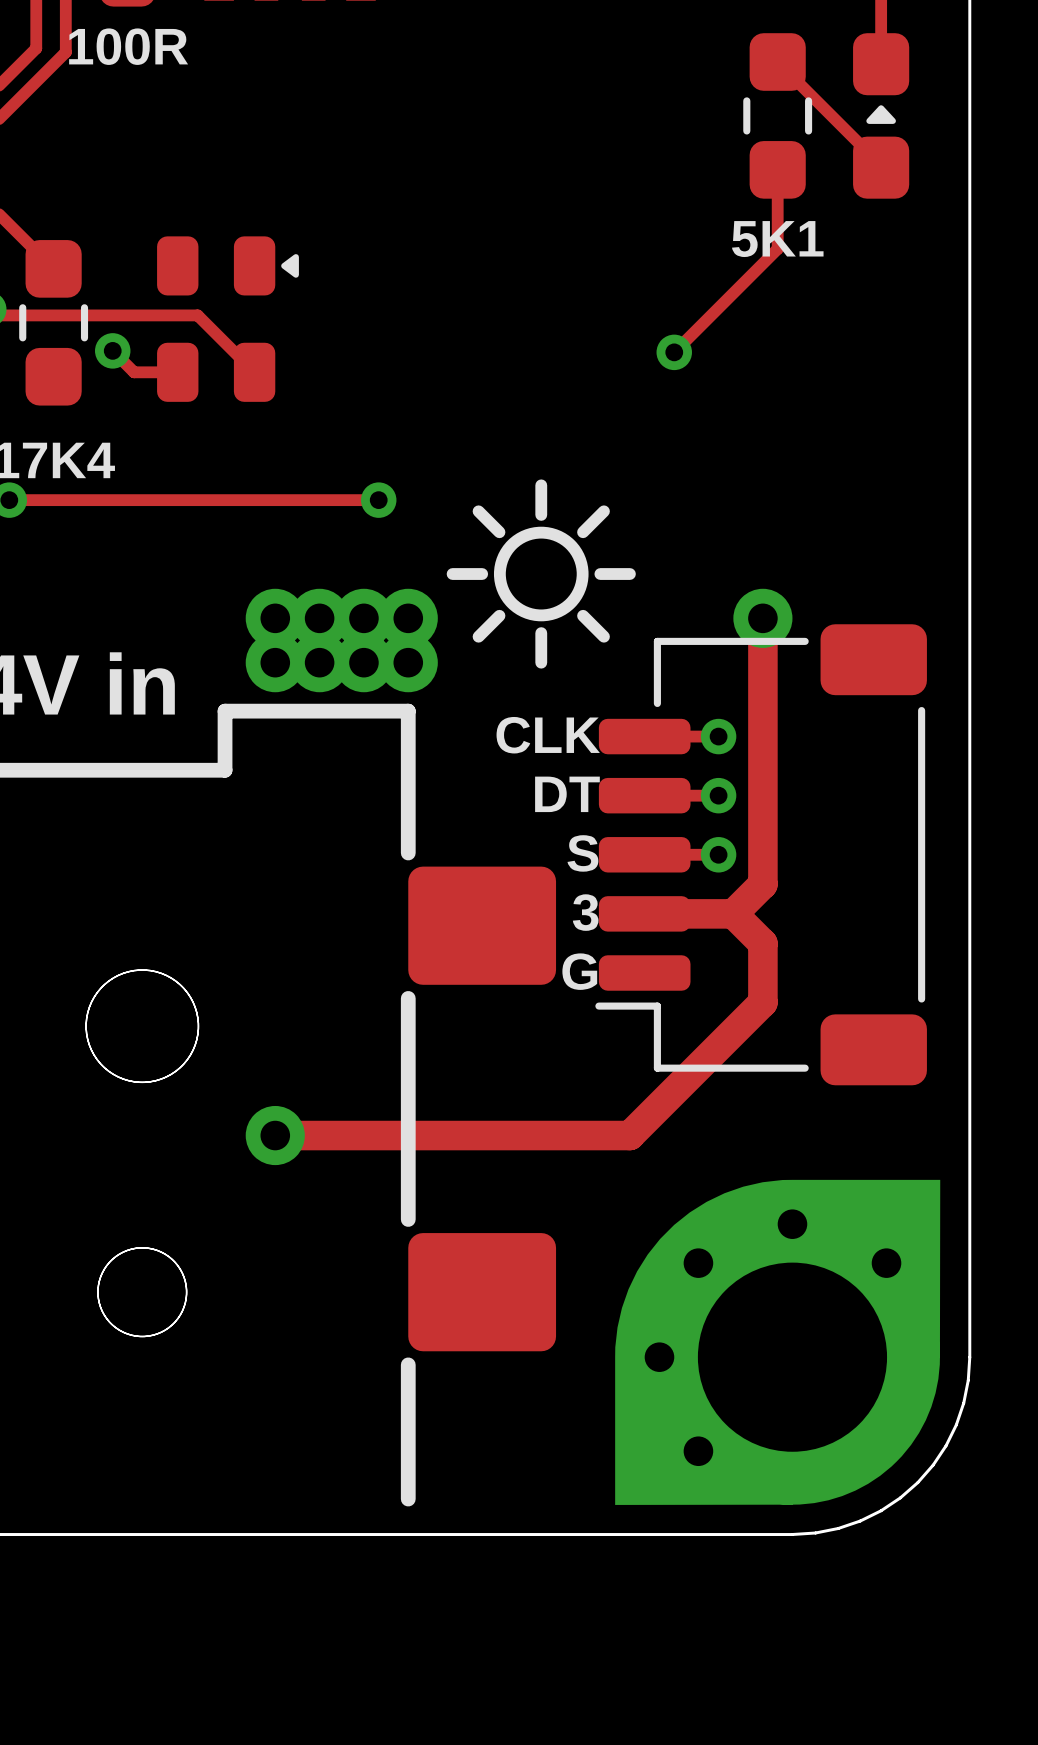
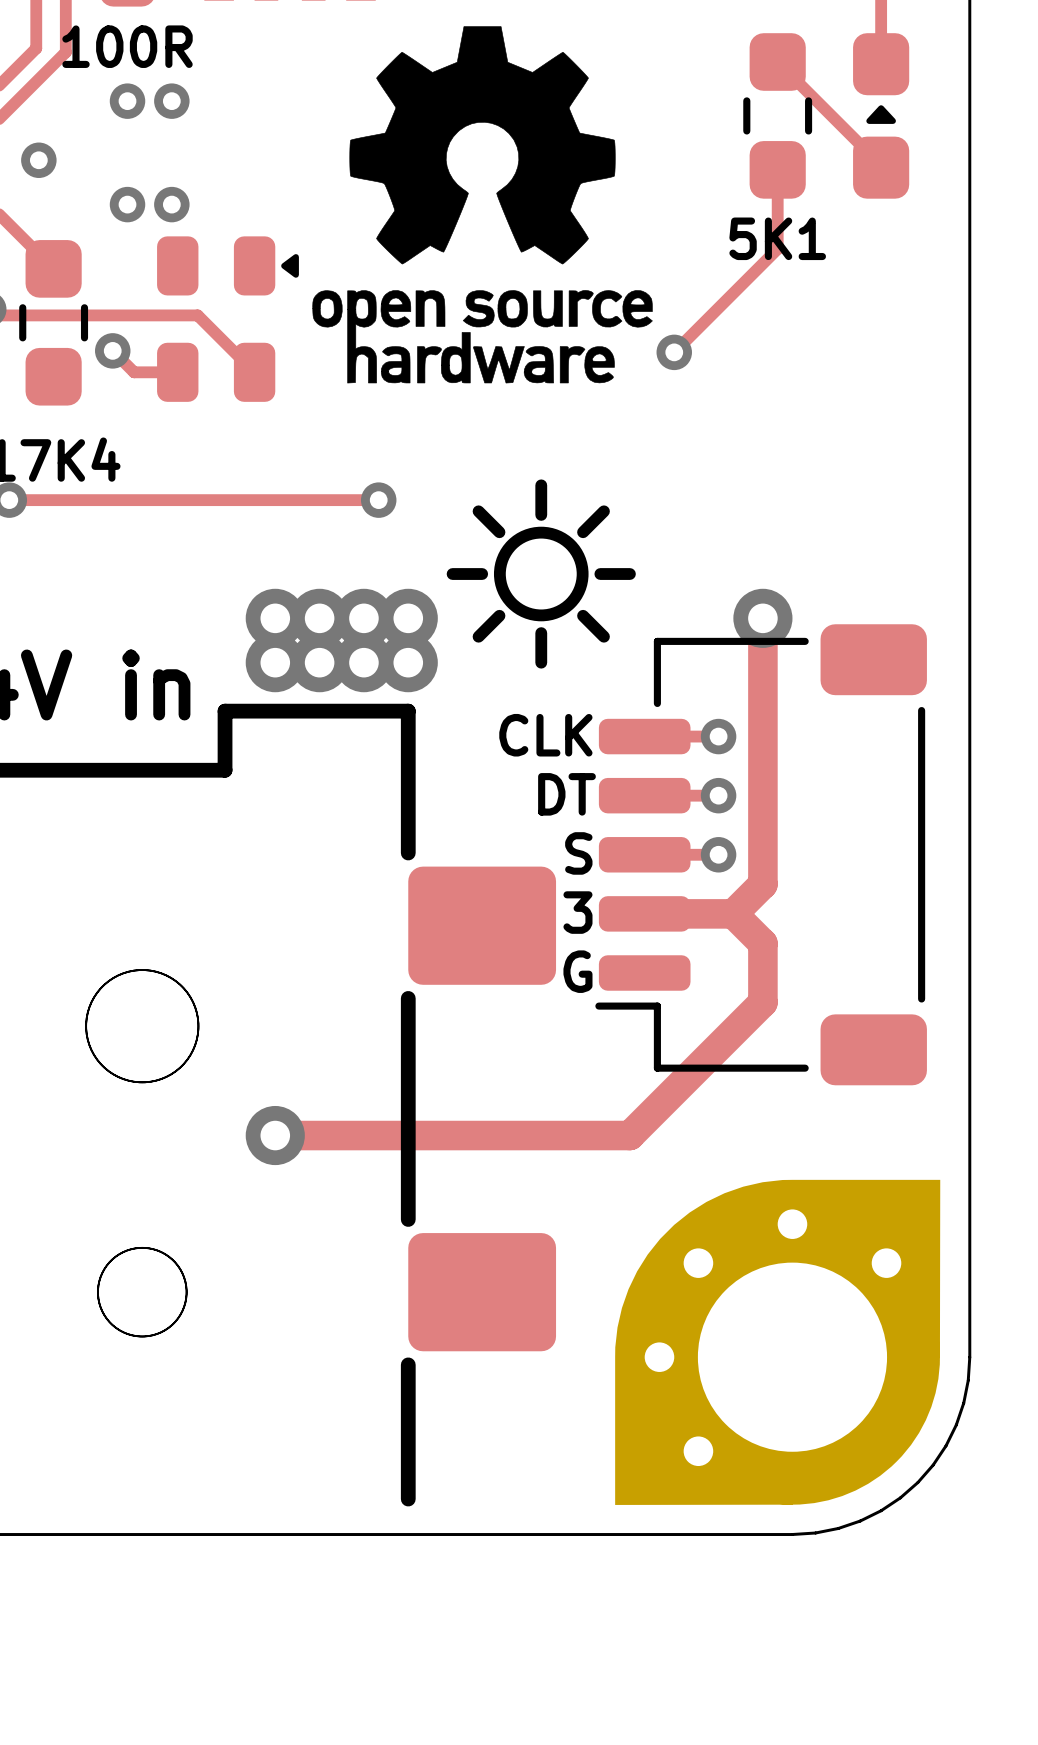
drawing: none -> [312, 26, 653, 384]
via: none -> (127, 101)
via: none -> (171, 101)
via: none -> (38, 160)
via: none -> (127, 204)
via: none -> (171, 204)

